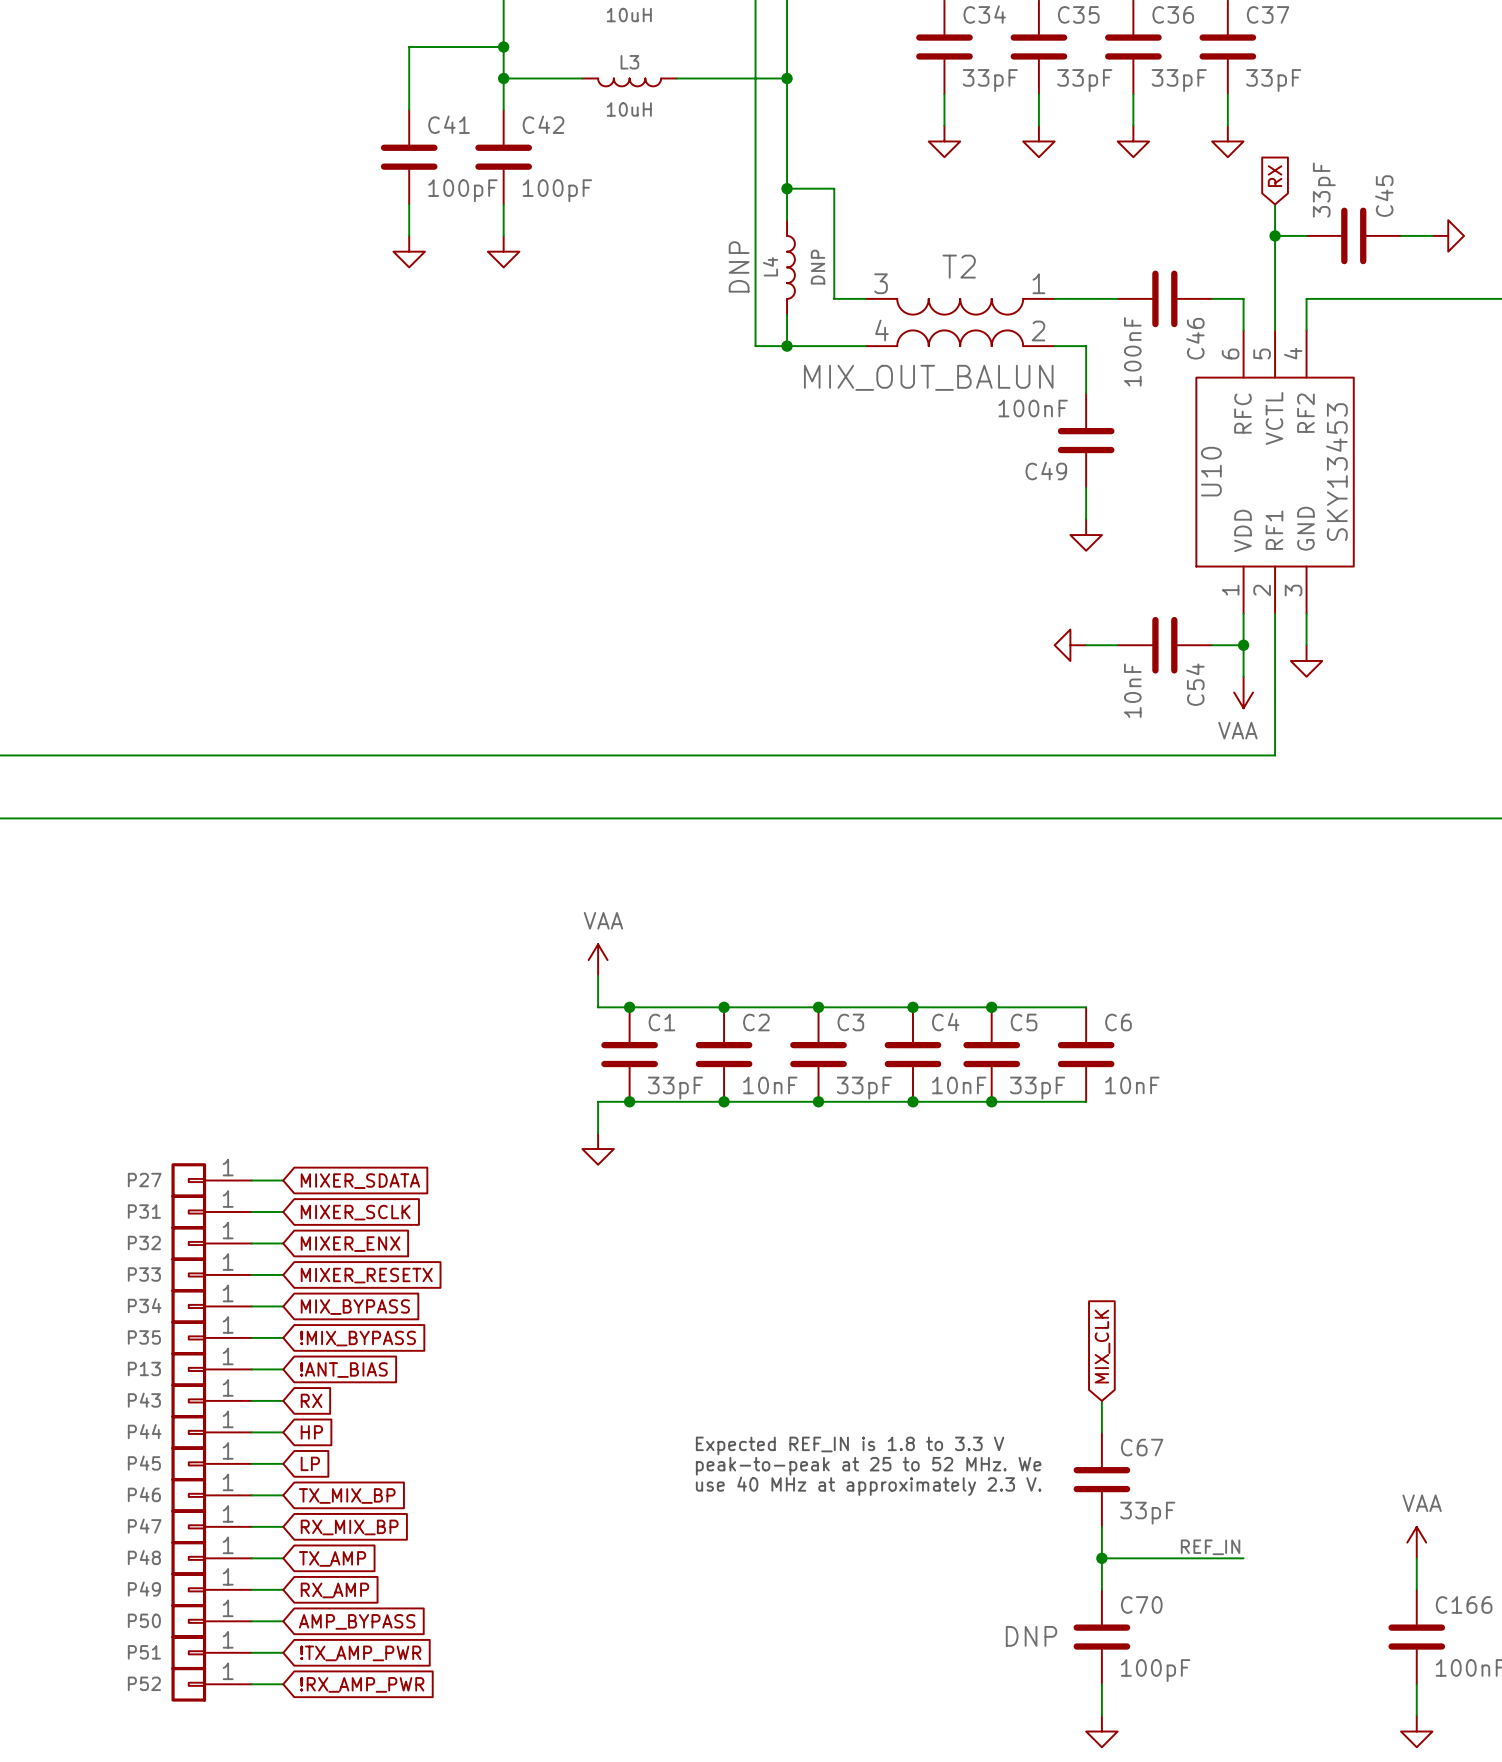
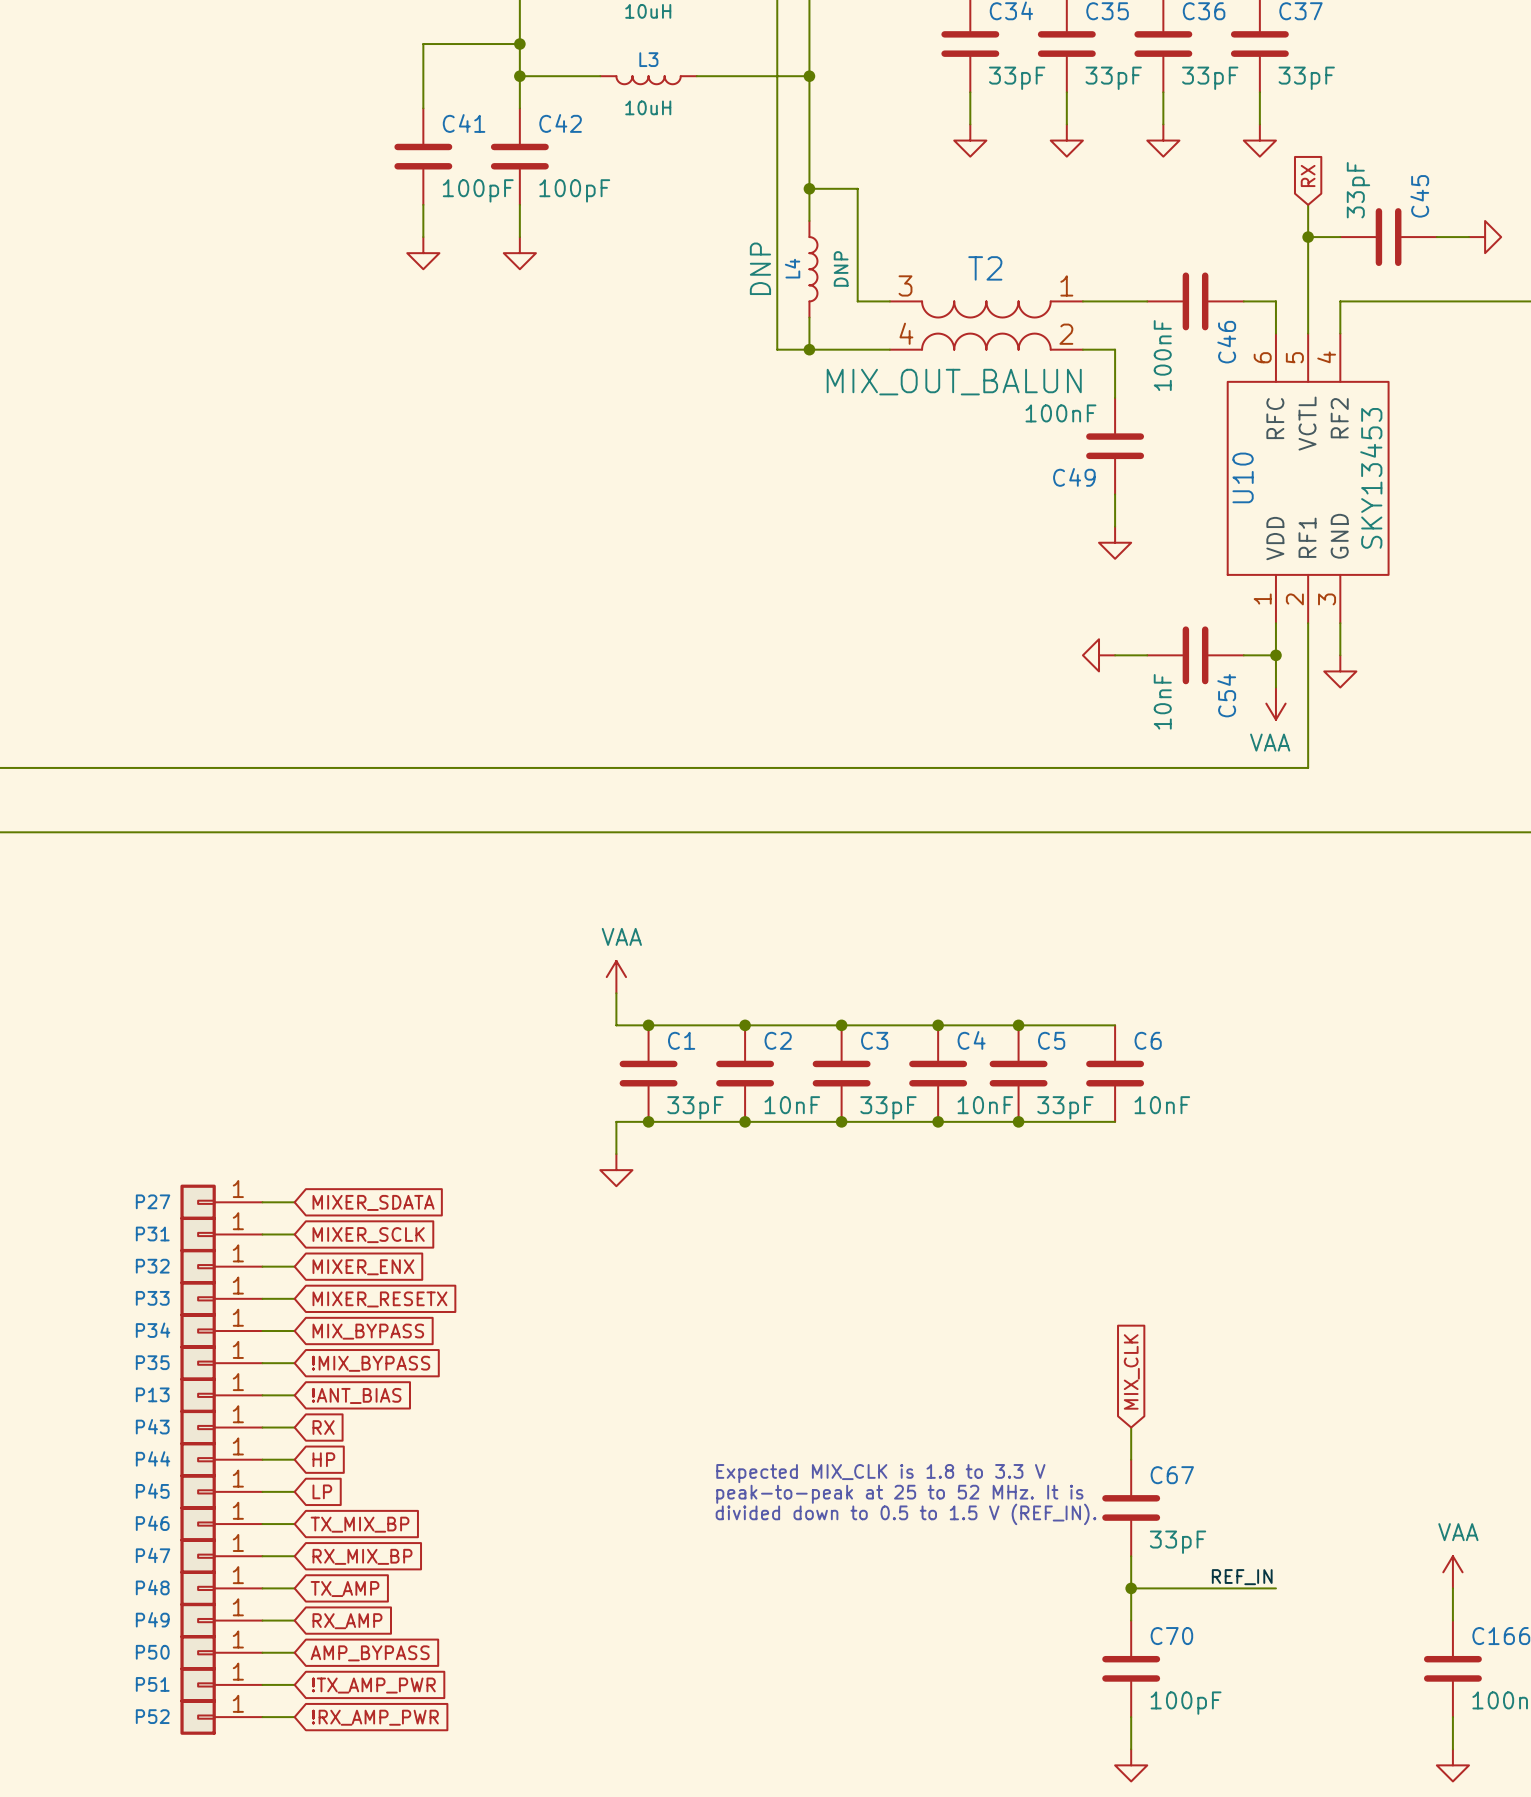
text: Expected REF_IN is 1.8 to 3.3 V (850, 1445) -> Expected MIX_CLK is 1.8 to 3.3 V (880, 1473)
text: peak-to-peak at 25 to 52 MHz. We (868, 1466) -> peak-to-peak at 25 to 52 MHz. It is (899, 1494)
text: use 40 MHz at approximately 2.3 V. (868, 1486) -> divided down to 0.5 to 1.5 V (REF_IN). (906, 1514)
C70 text: DNP (1031, 1636) -> none

